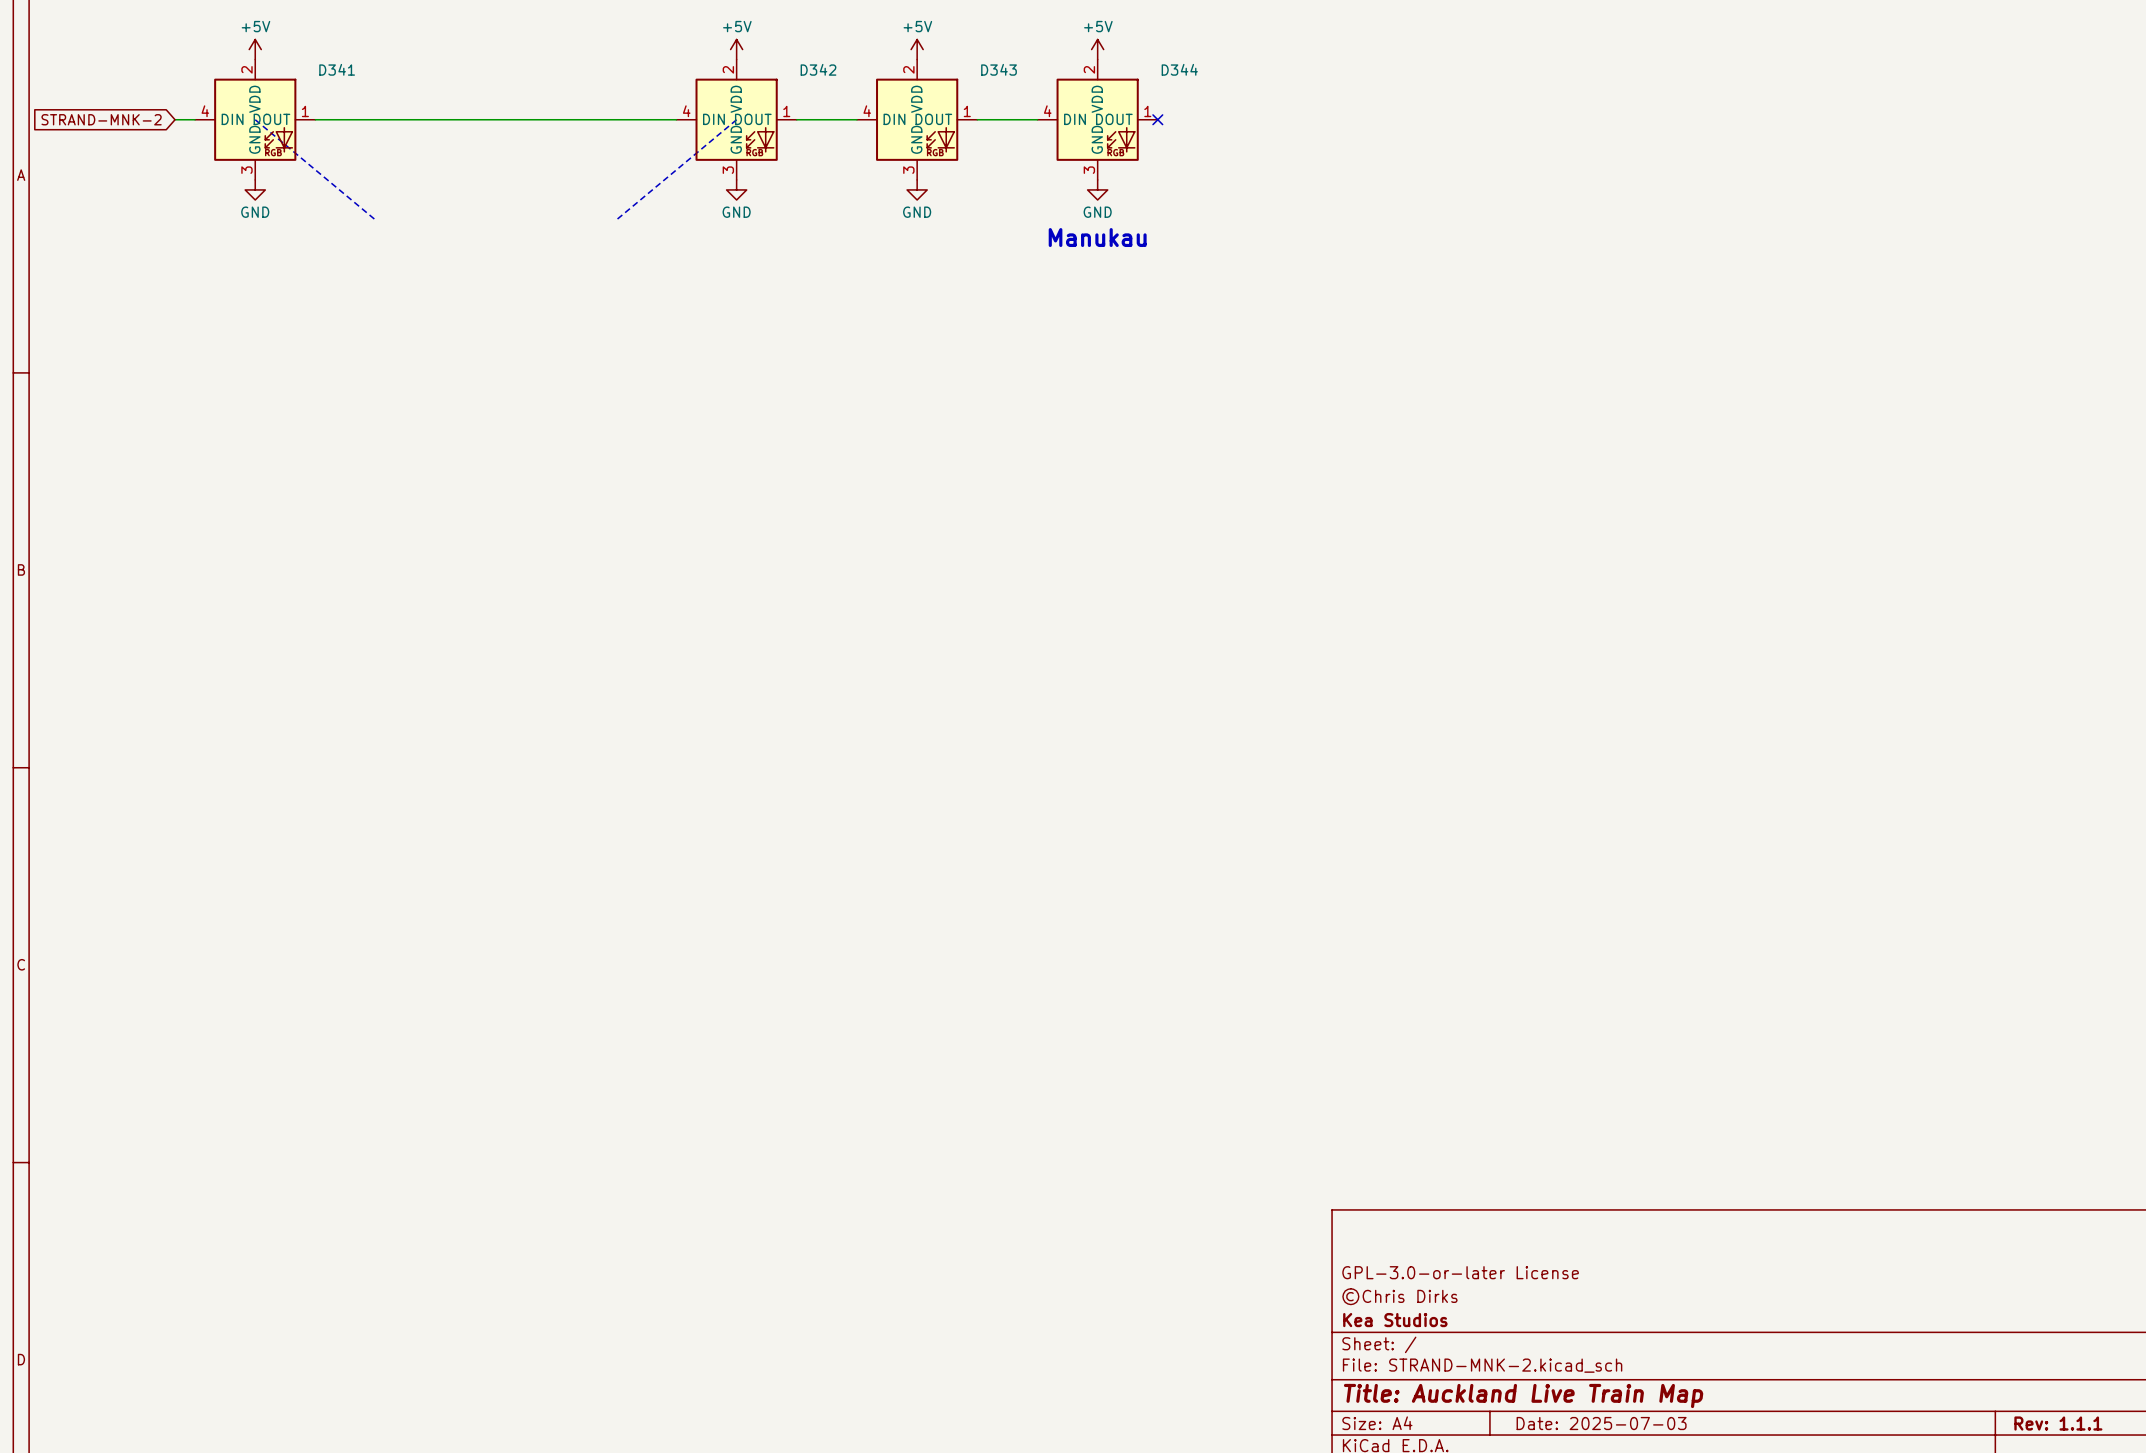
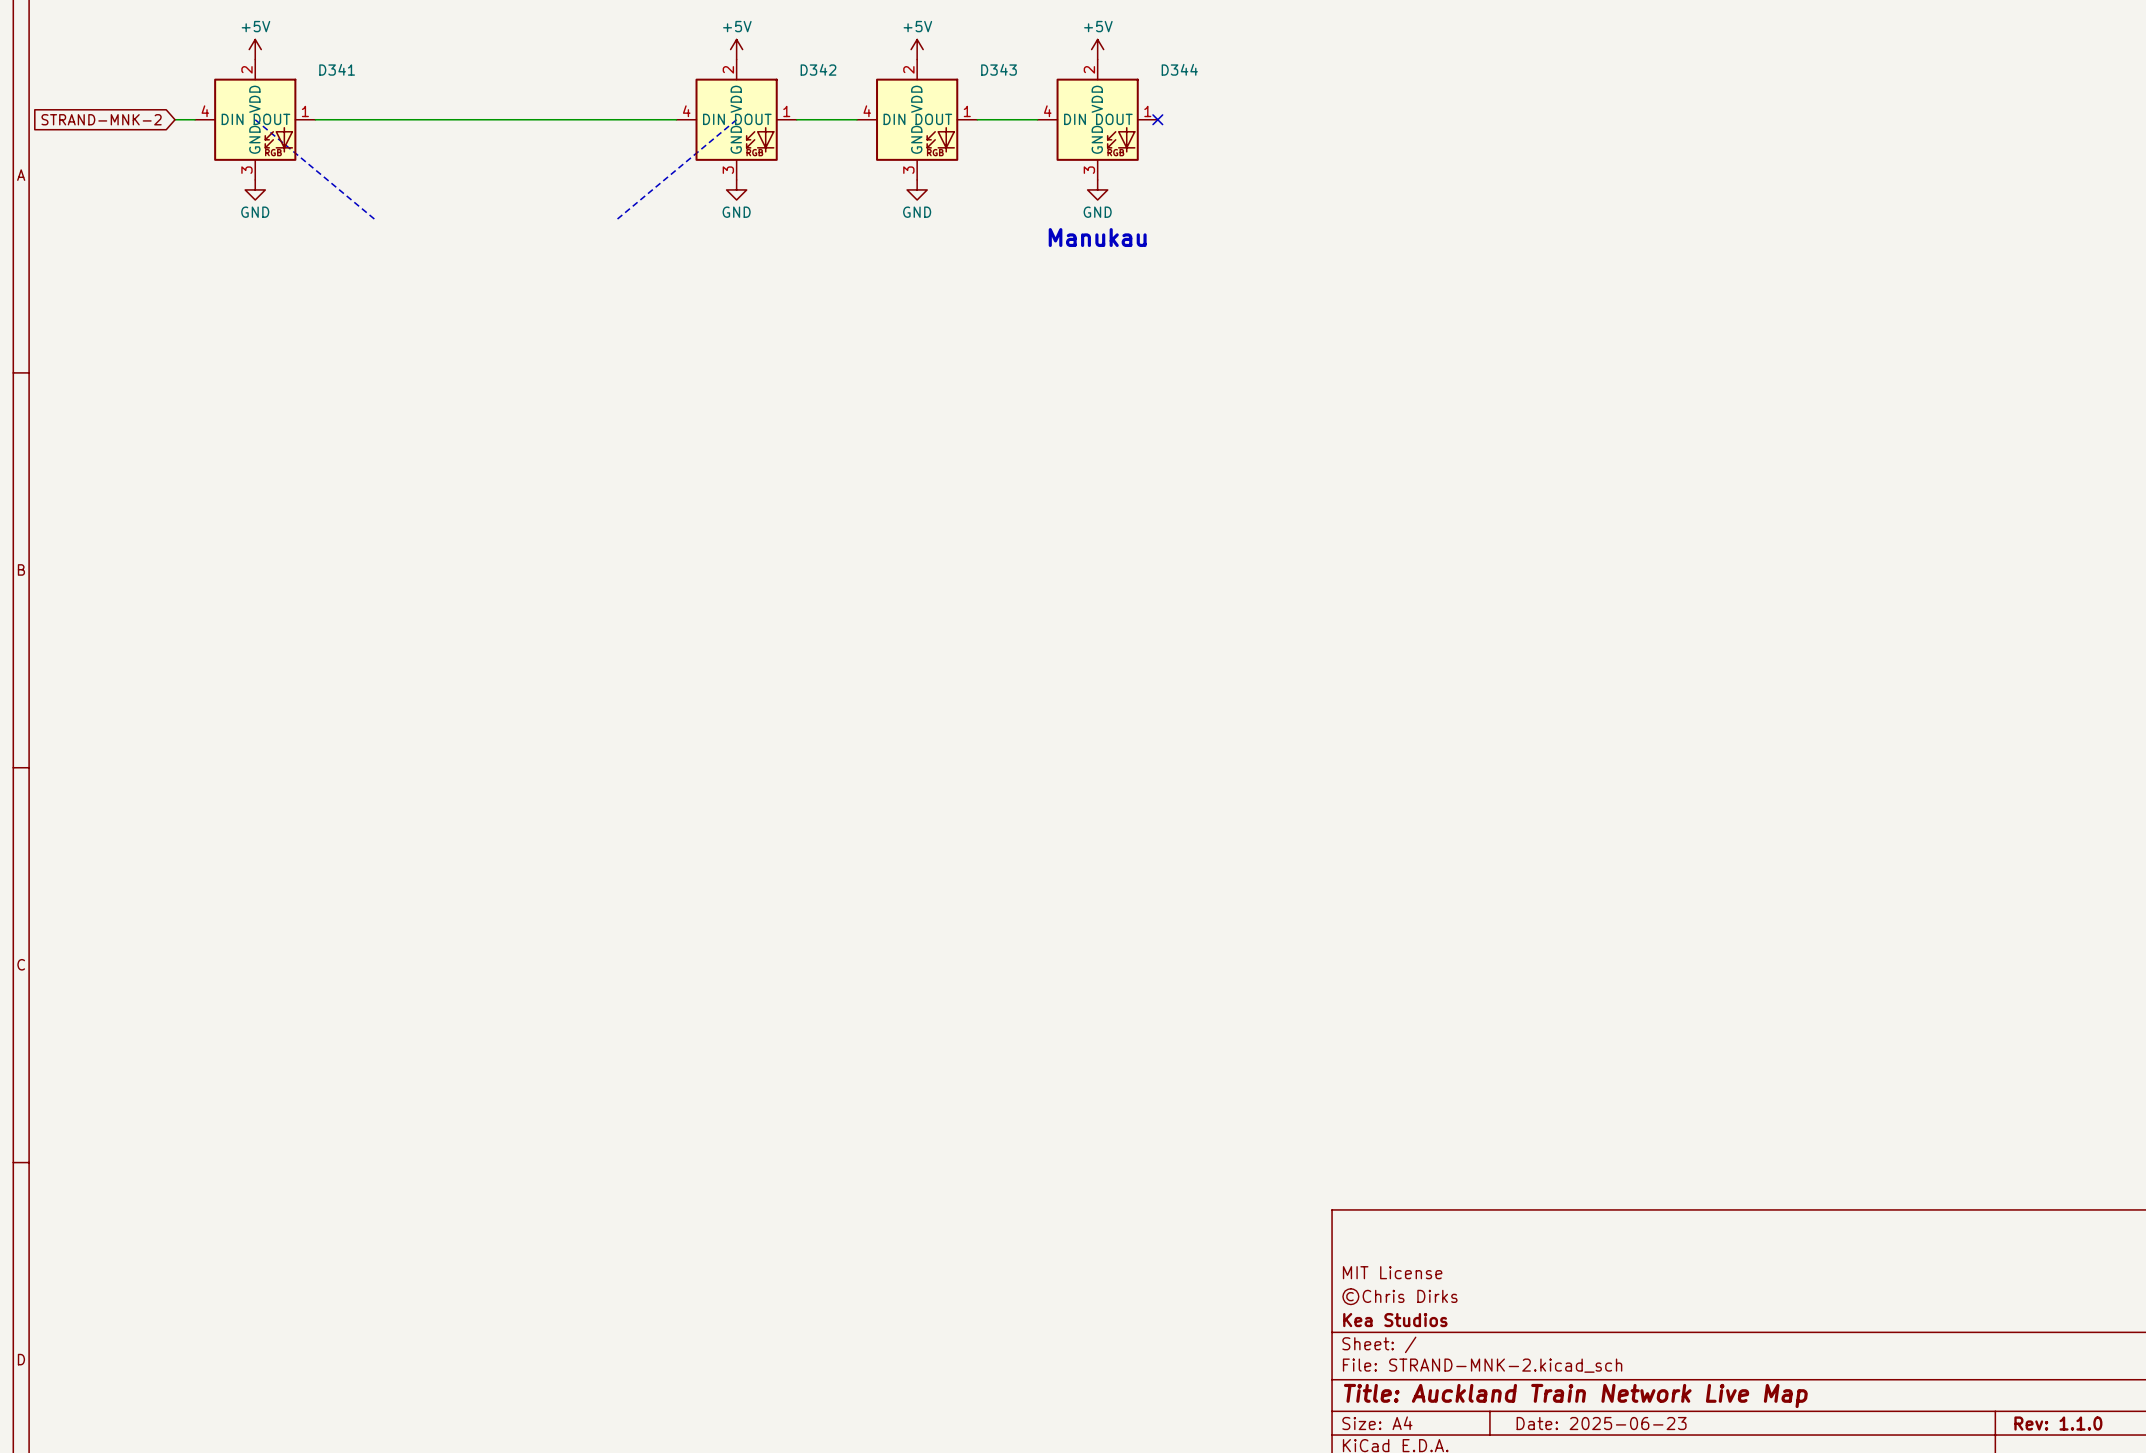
title block: GPL-3.0-or-later License (1460, 1272) -> MIT License (1392, 1272)
title block: Title: Auckland Live Train Map (1523, 1395) -> Title: Auckland Train Network Live Map (1575, 1395)
title block: Date: 2025-07-03 (1601, 1423) -> Date: 2025-06-23 (1601, 1423)
title block: Rev: 1.1.1 (2058, 1423) -> Rev: 1.1.0 (2058, 1423)

